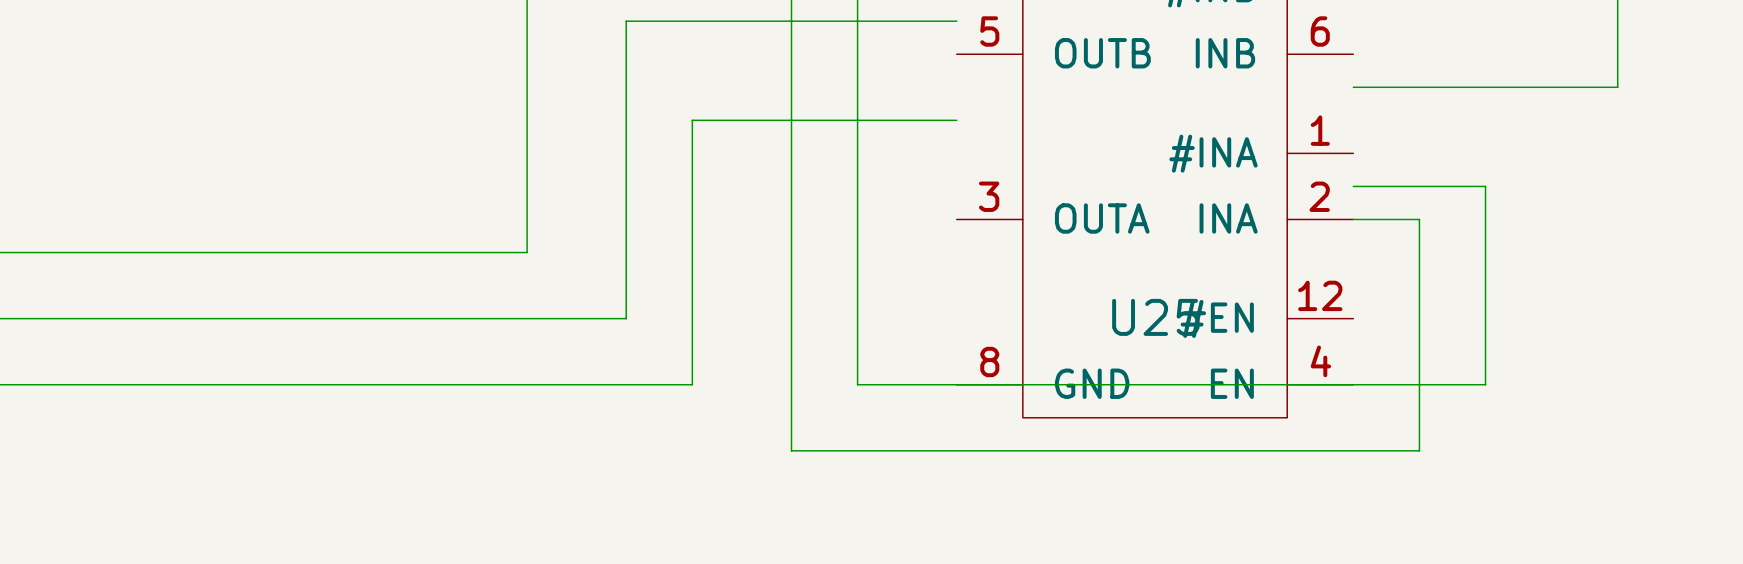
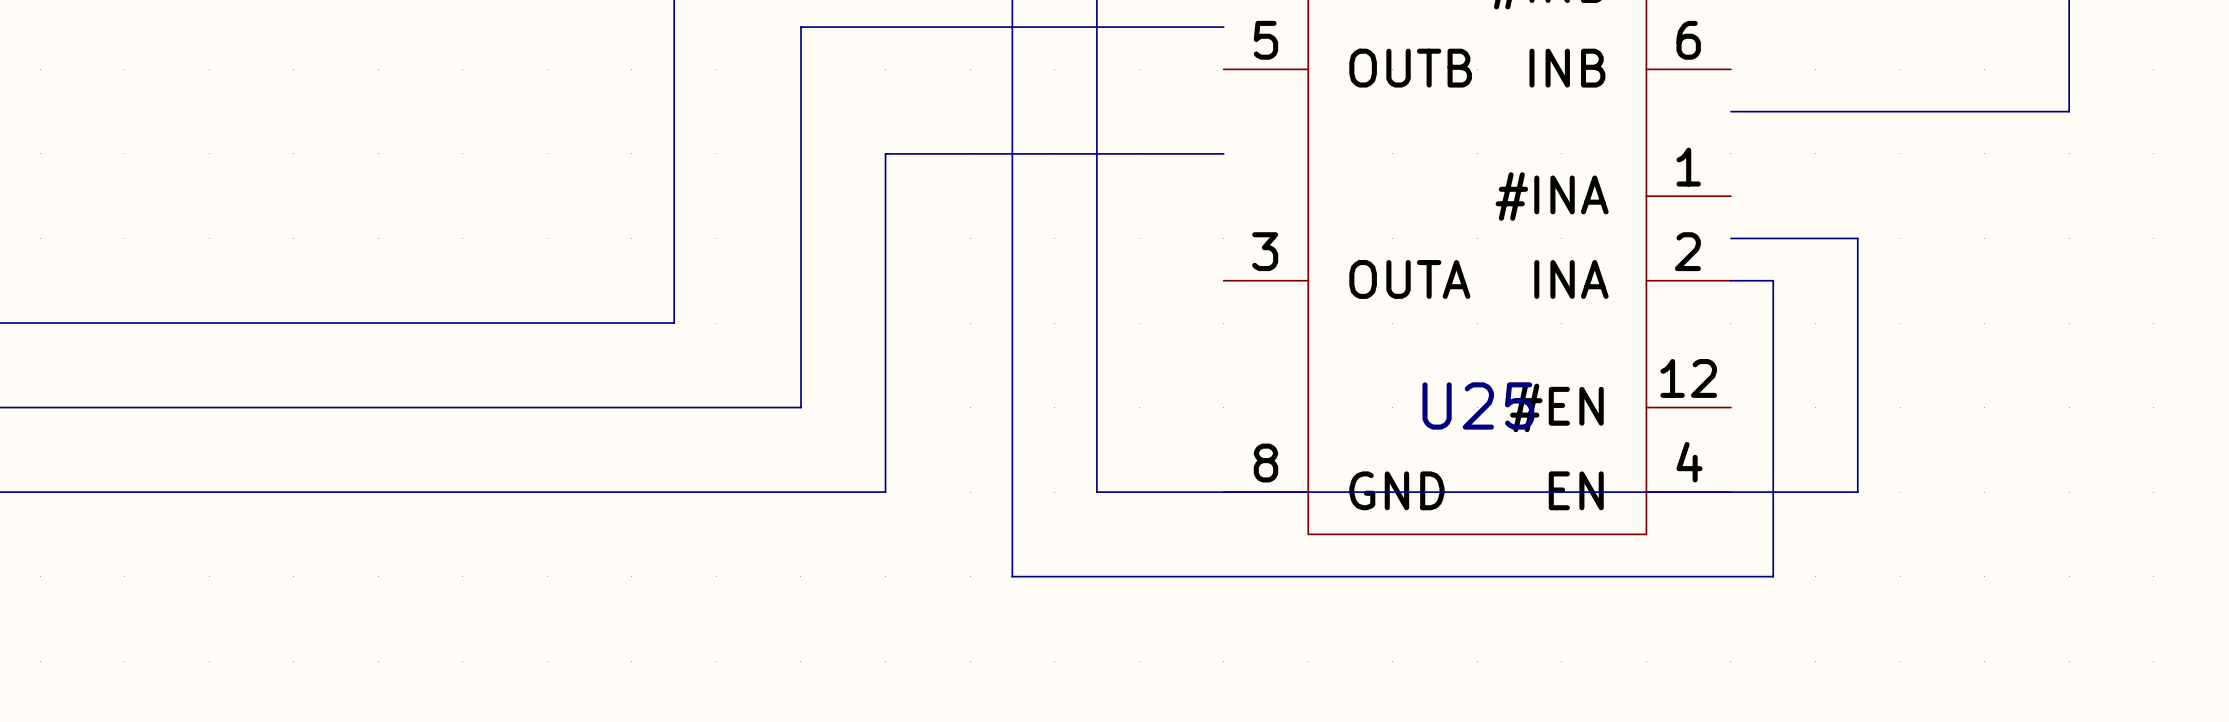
wire: (1452, 186) (1485, 186) (1485, 384) (1452, 384) -> (1857, 238) (1857, 492)
wire: (1386, 219) (1419, 219) (1419, 450) (1386, 450) -> (1773, 280) (1773, 576)

